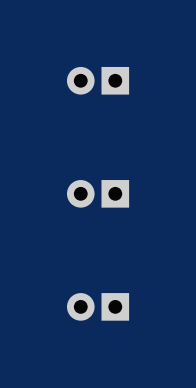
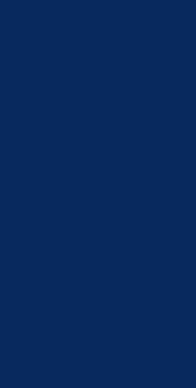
part: (98, 80) -> none
part: (98, 193) -> none
part: (98, 306) -> none

